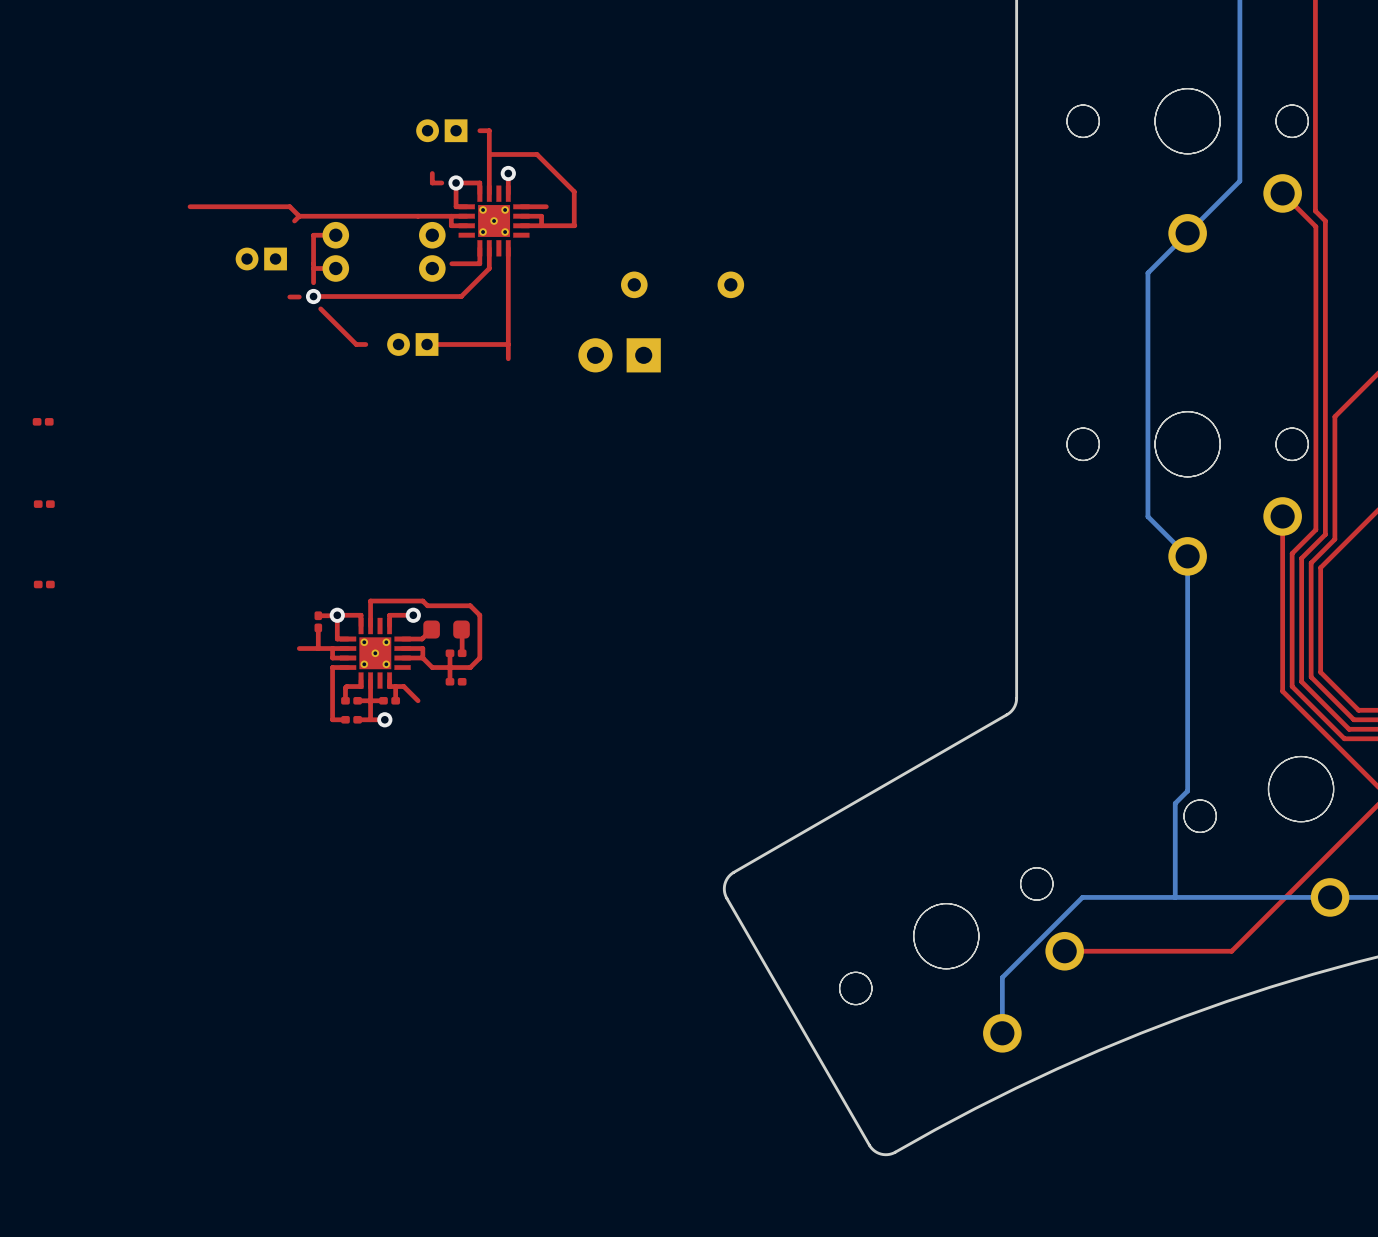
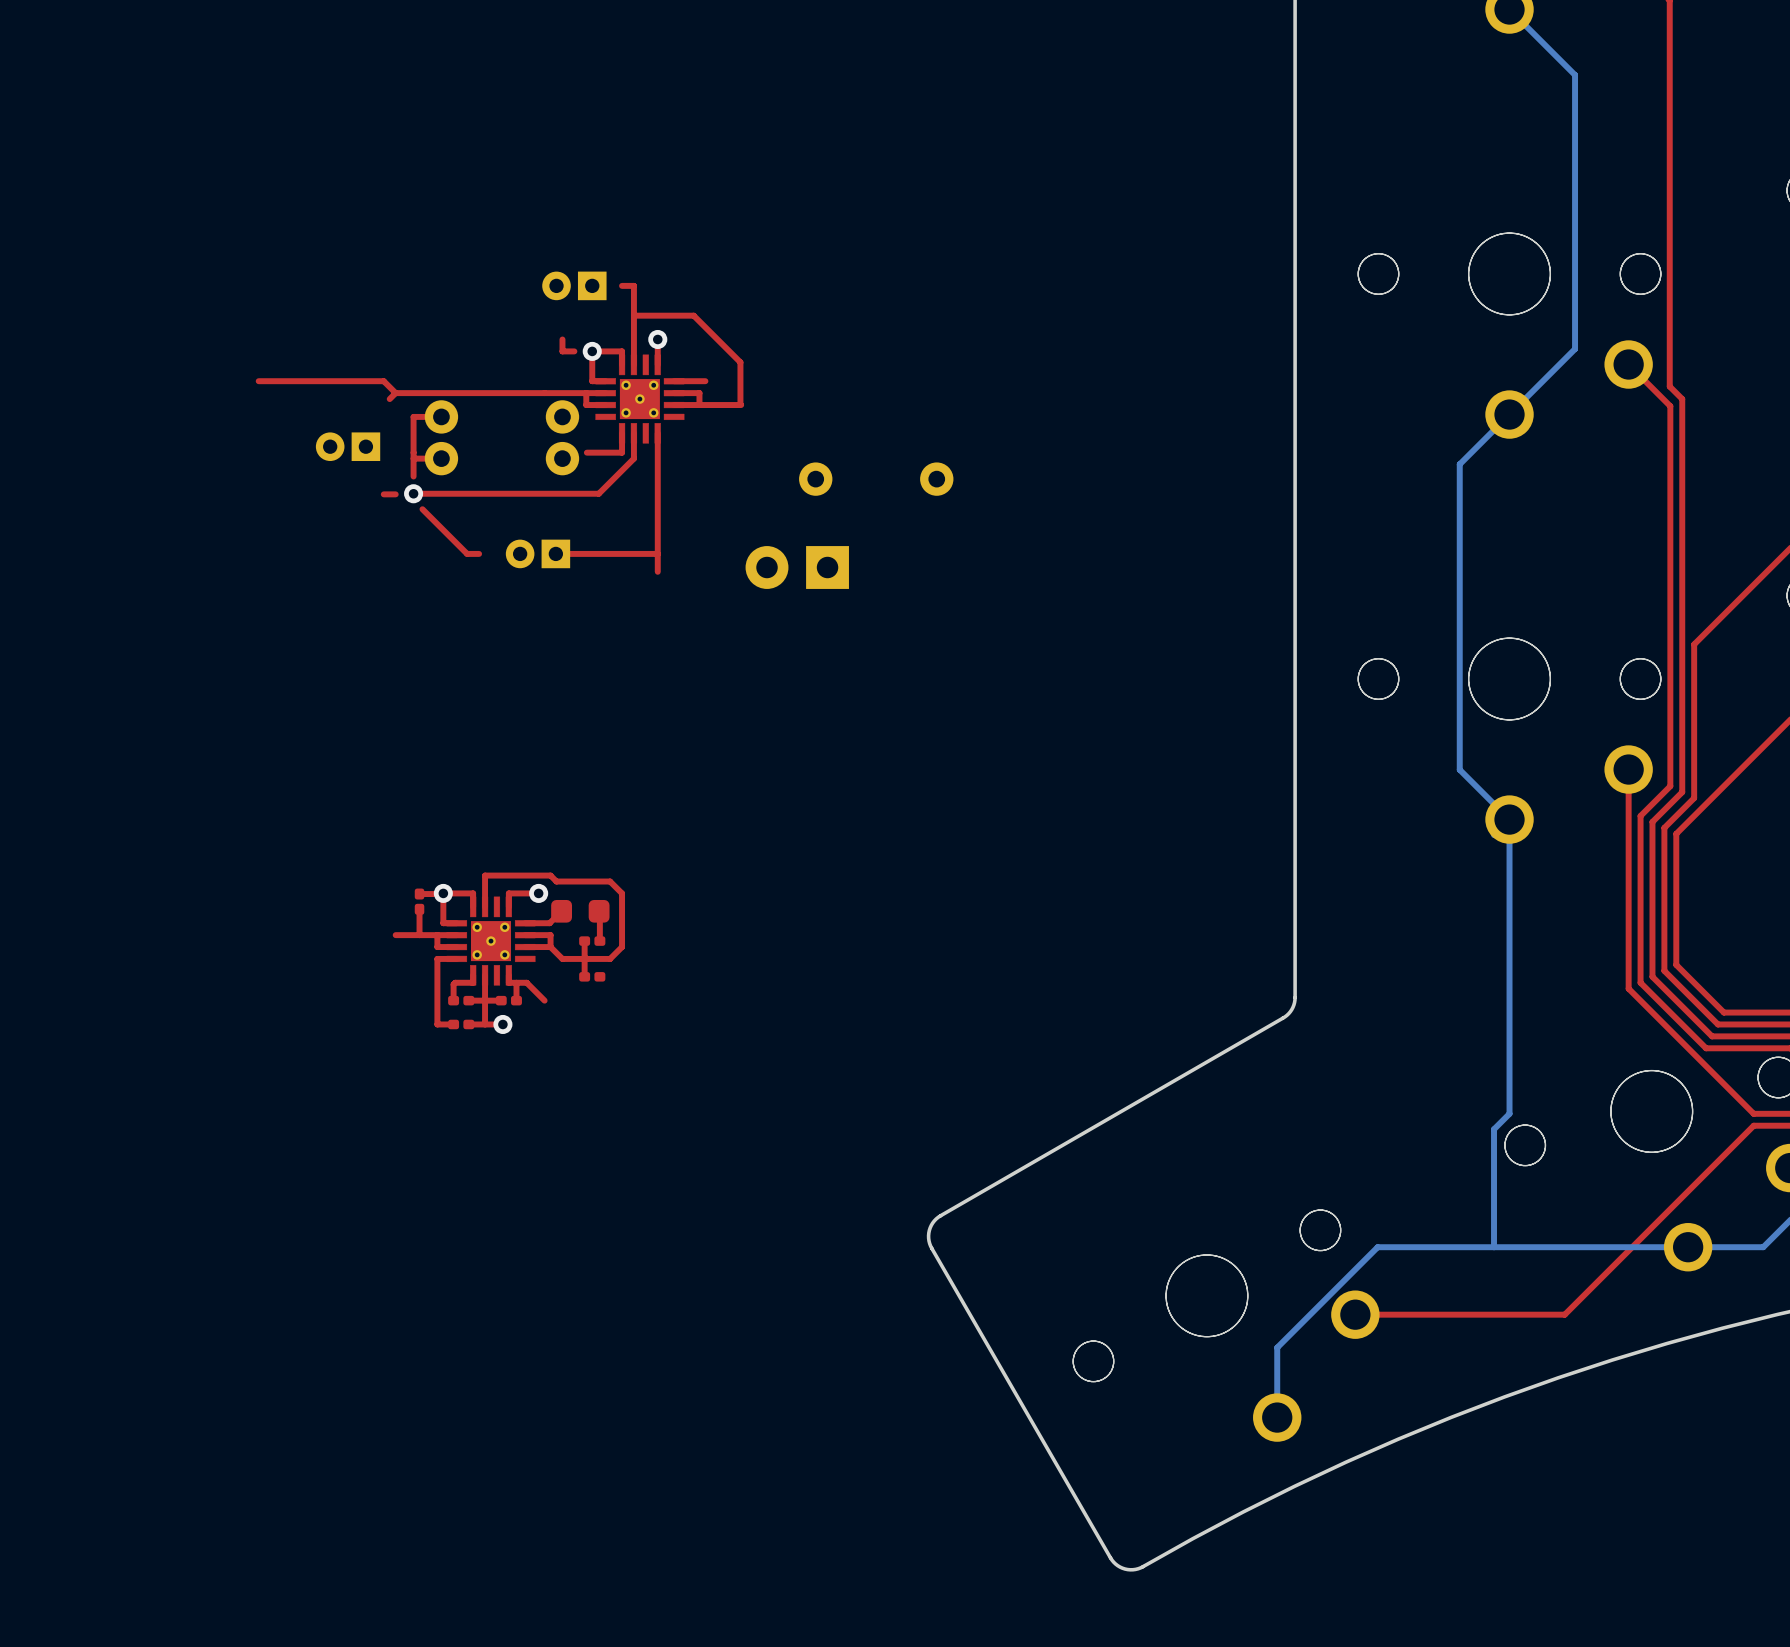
part: (43, 421) -> none
part: (44, 504) -> none
part: (44, 584) -> none

